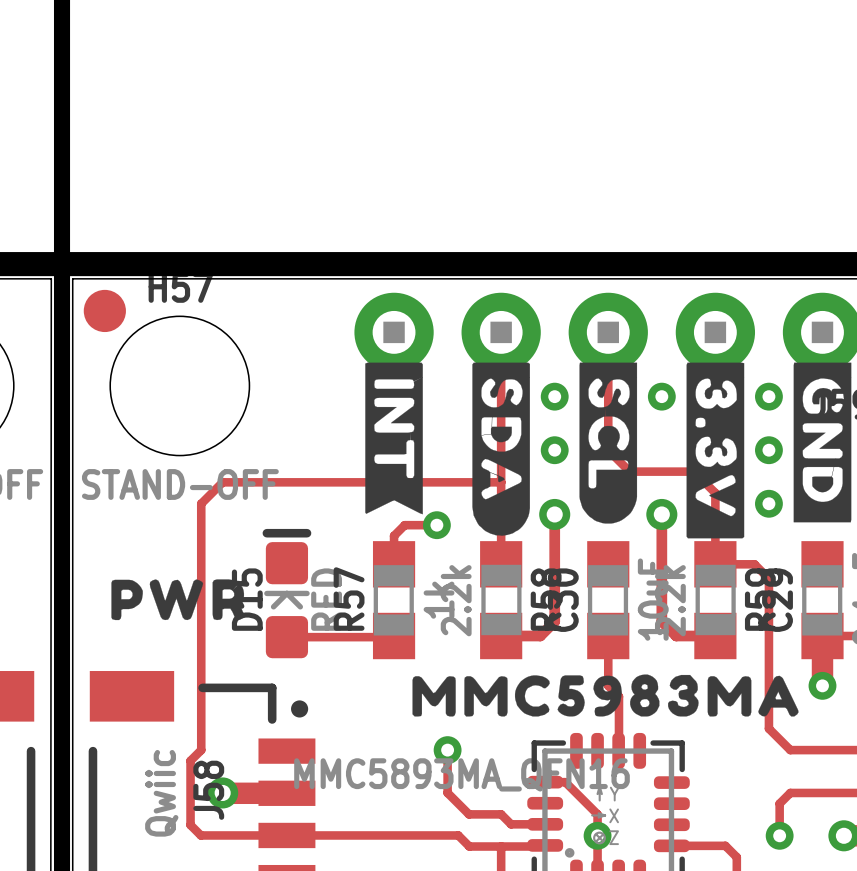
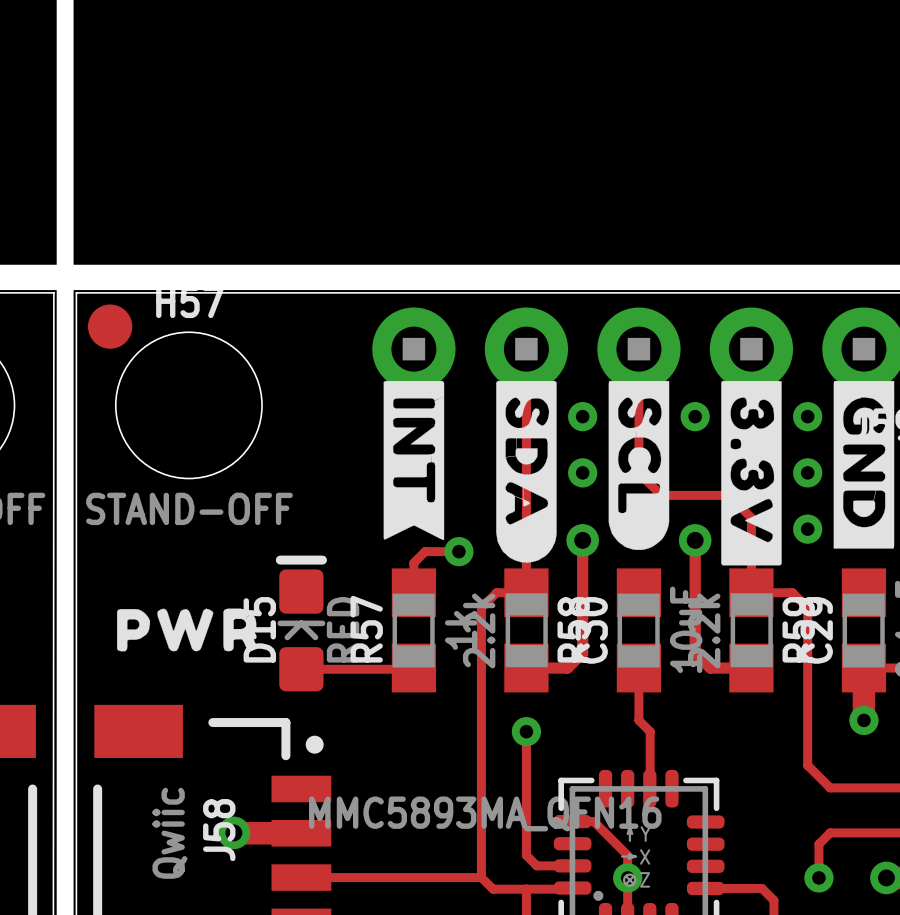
track: (501, 482) (222, 482) (201, 503) (201, 750) (190, 760) (190, 825) (200, 835) (286, 835) -> none
track: none -> (526, 592) (496, 592) (481, 607) (481, 877)
drawing: [412, 674, 799, 717] -> none
track: (447, 750) (447, 792) (469, 814) (501, 814) -> (526, 731) (526, 855)
via position: (447, 750) -> (526, 731)

